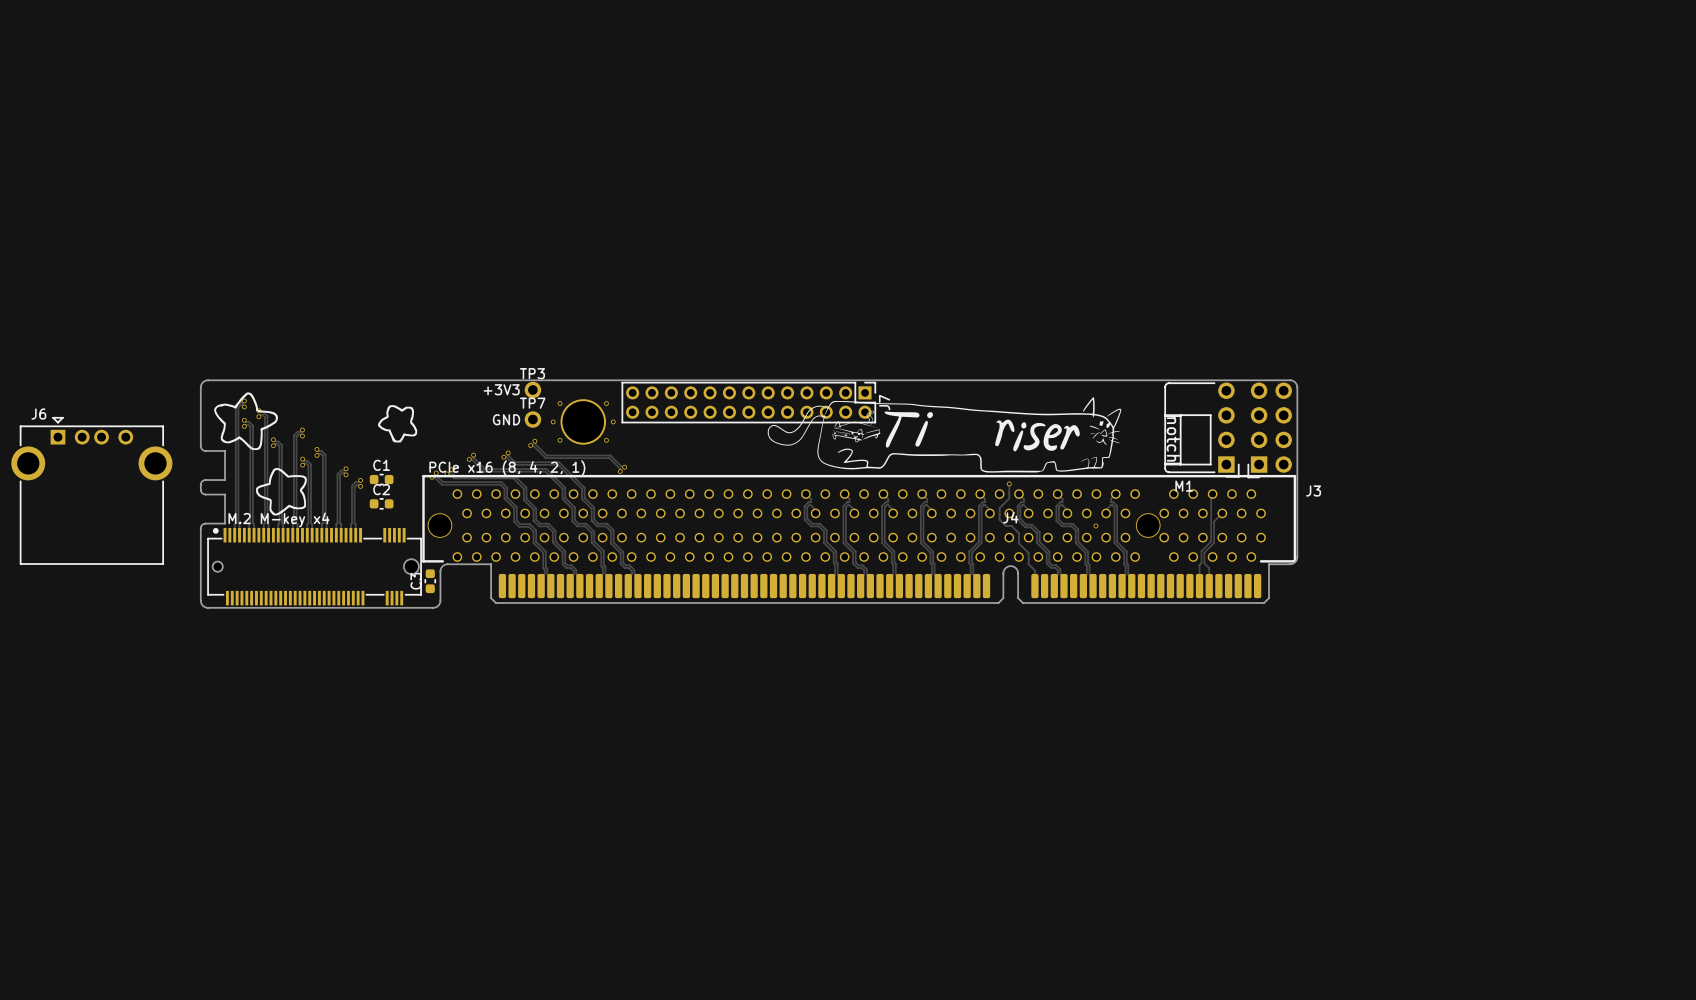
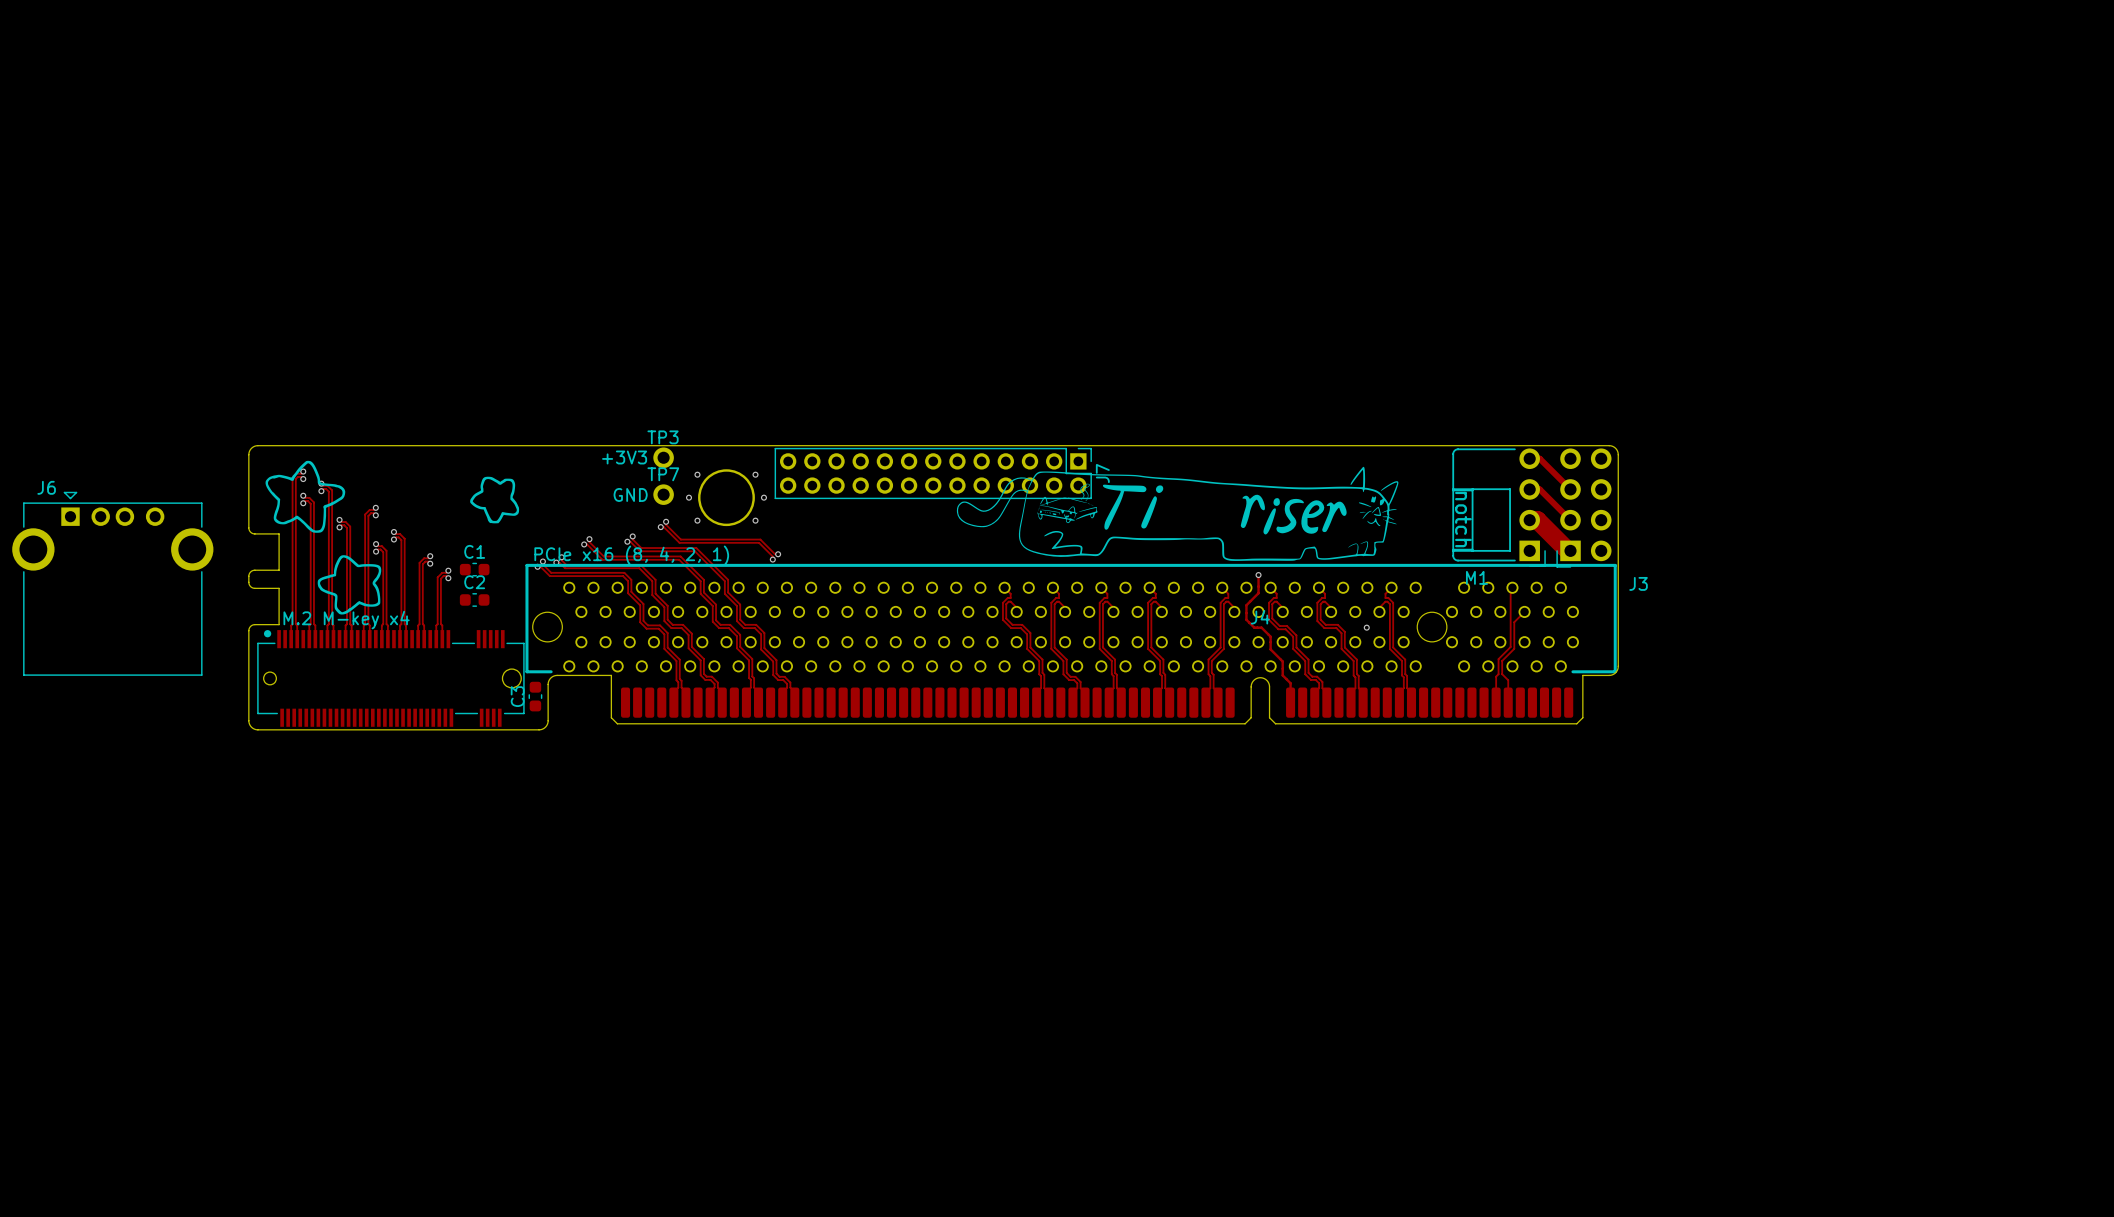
track: none -> (1529, 458) (1539, 458) (1570, 489)
track: none -> (1529, 489) (1539, 489) (1570, 520)
track: none -> (1529, 520) (1537, 520) (1568, 550) (1570, 550)

